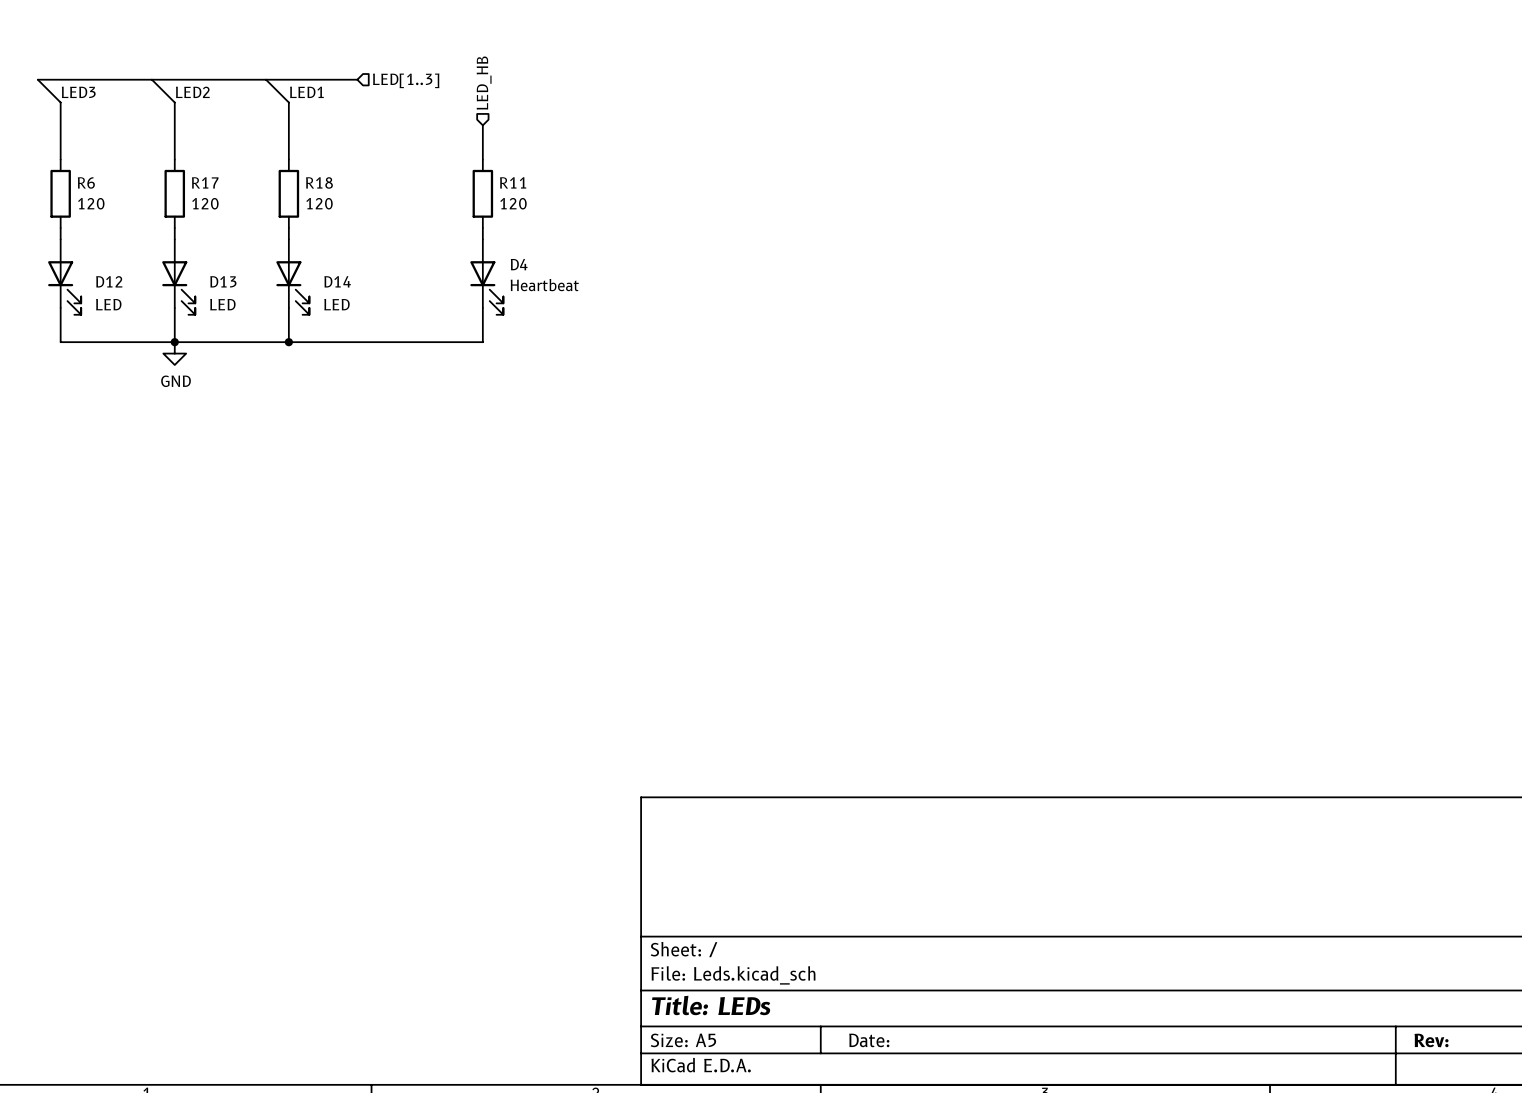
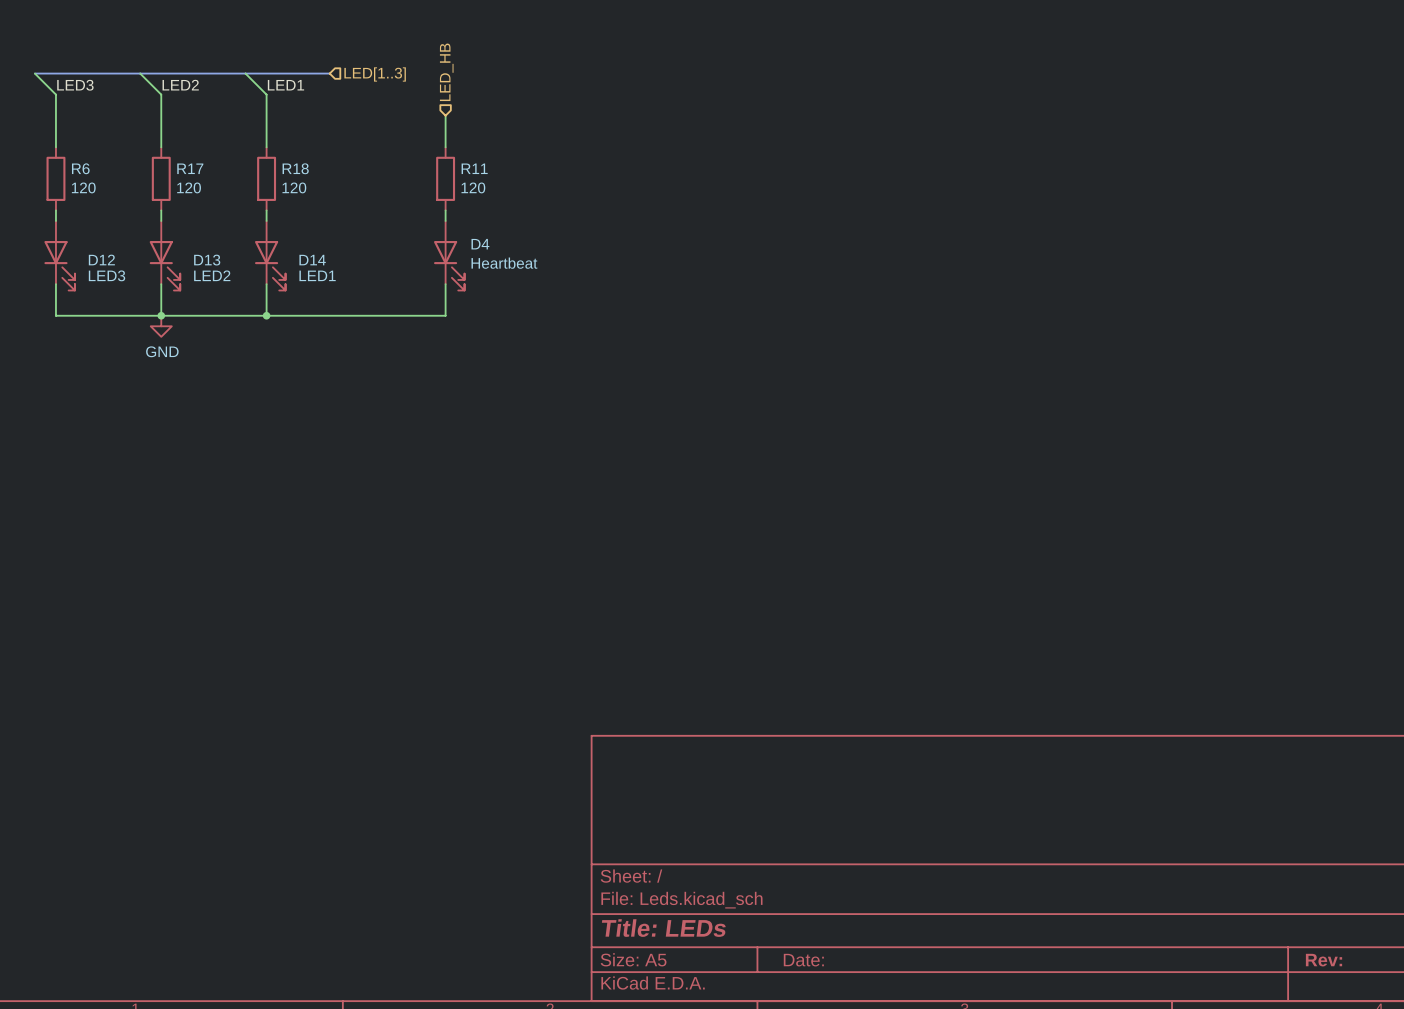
D12 value: LED (108, 304) -> LED3 (107, 275)
D13 value: LED (222, 304) -> LED2 (212, 275)
D14 value: LED (336, 304) -> LED1 (317, 275)

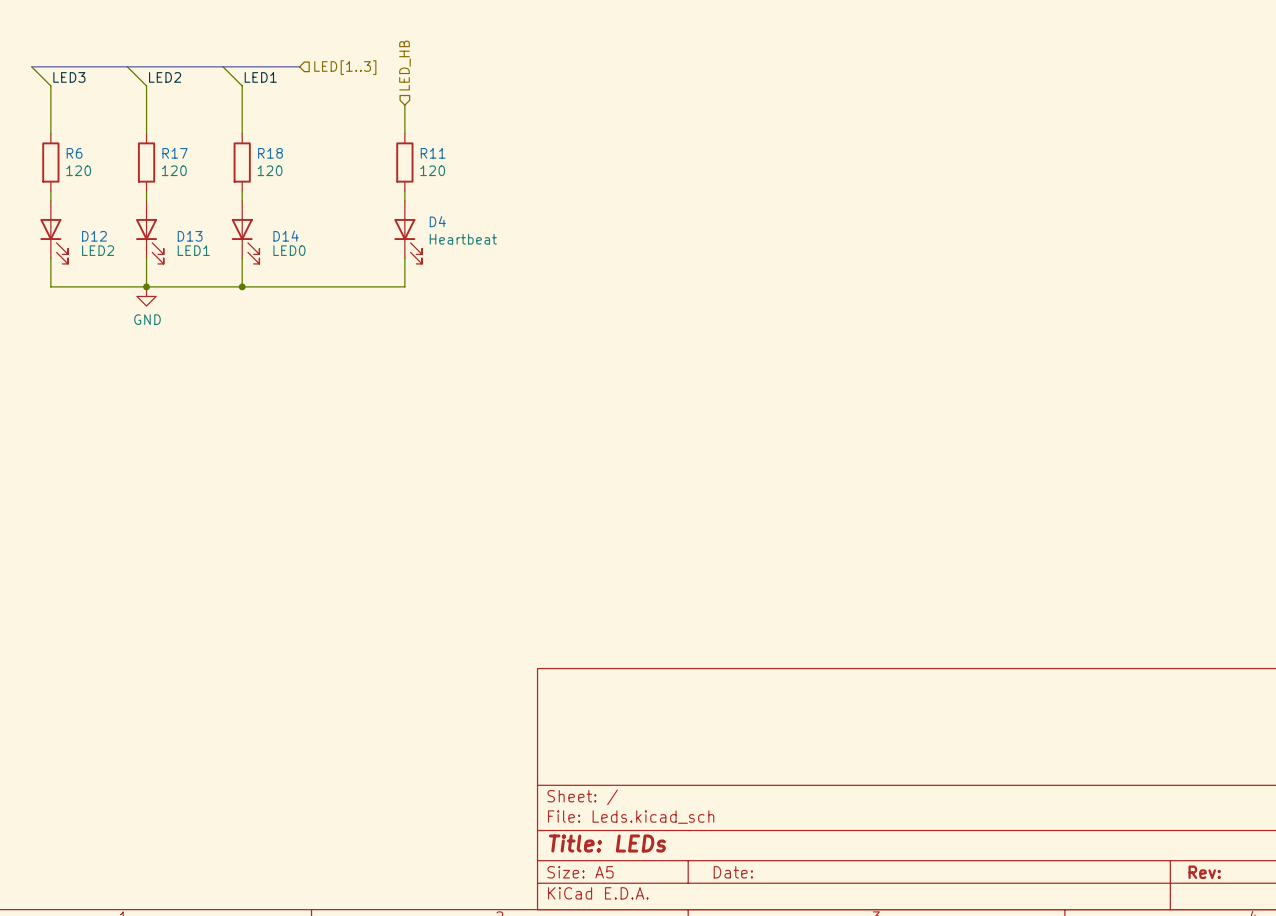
D12 value: LED3 (107, 275) -> LED2 (98, 250)
D13 value: LED2 (212, 275) -> LED1 (193, 250)
D14 value: LED1 (317, 275) -> LED0 (289, 250)

